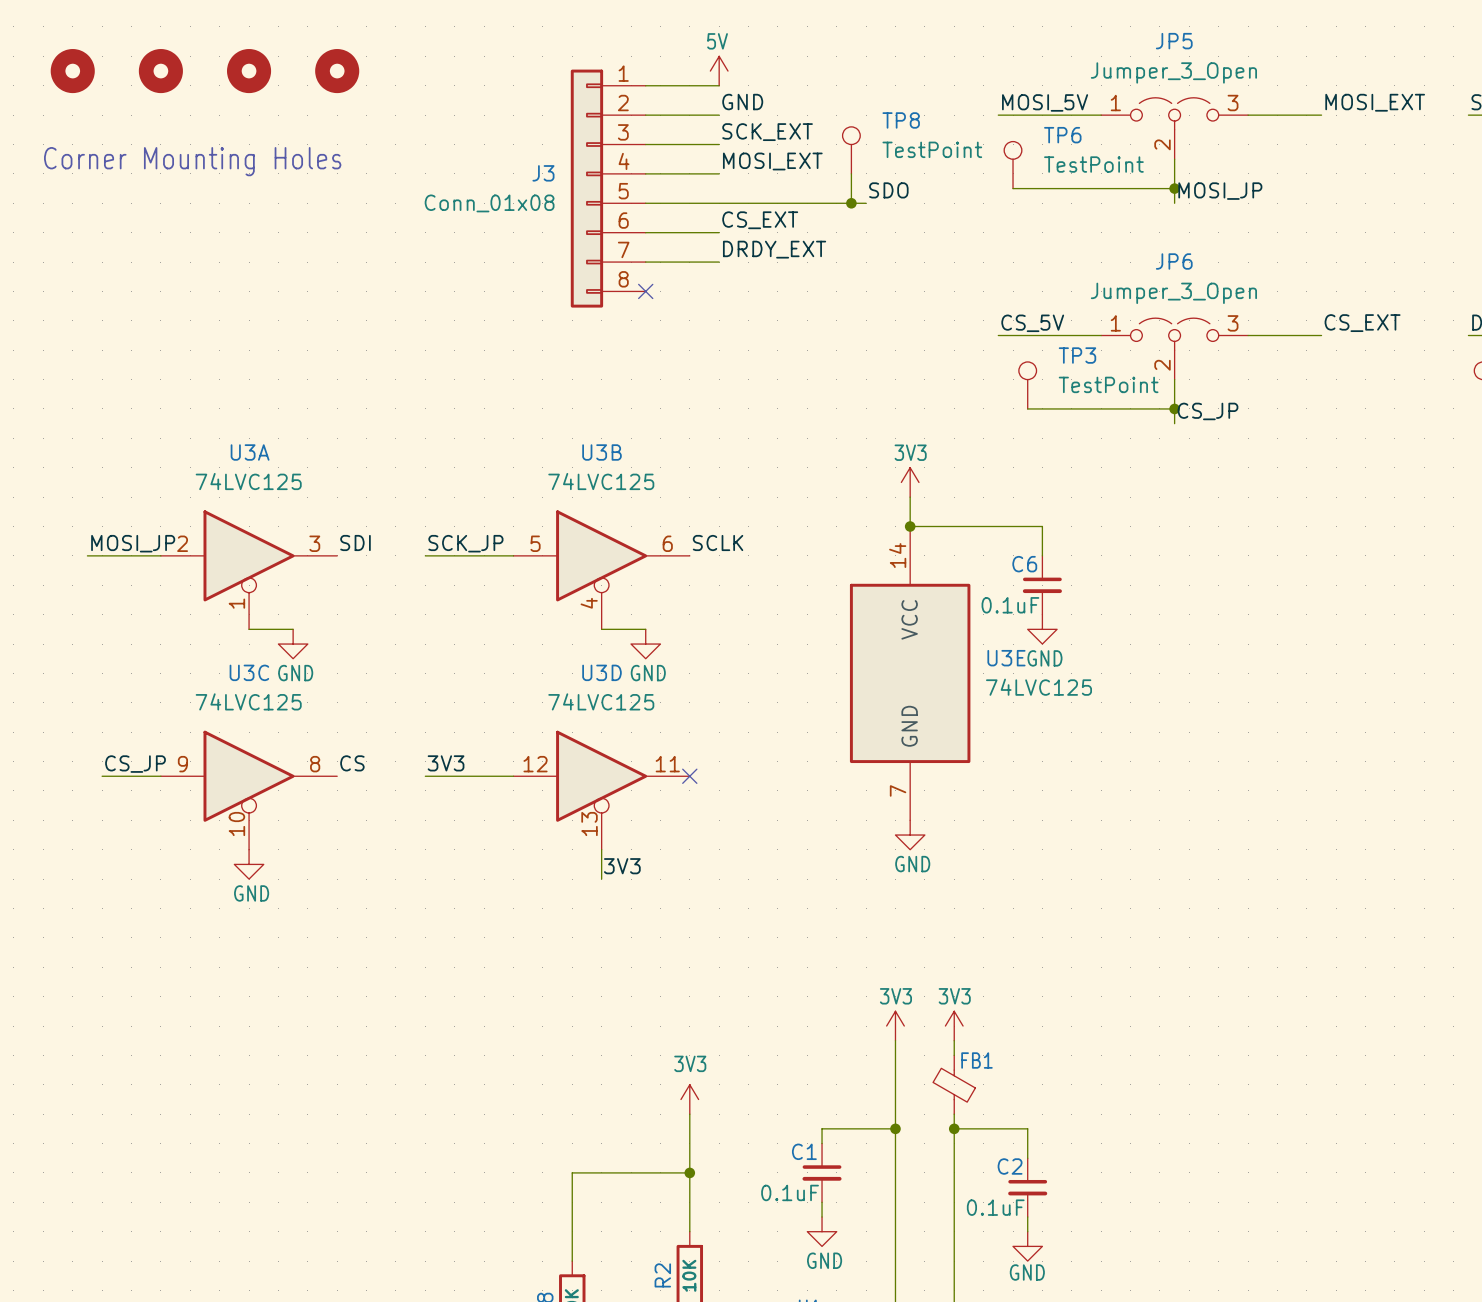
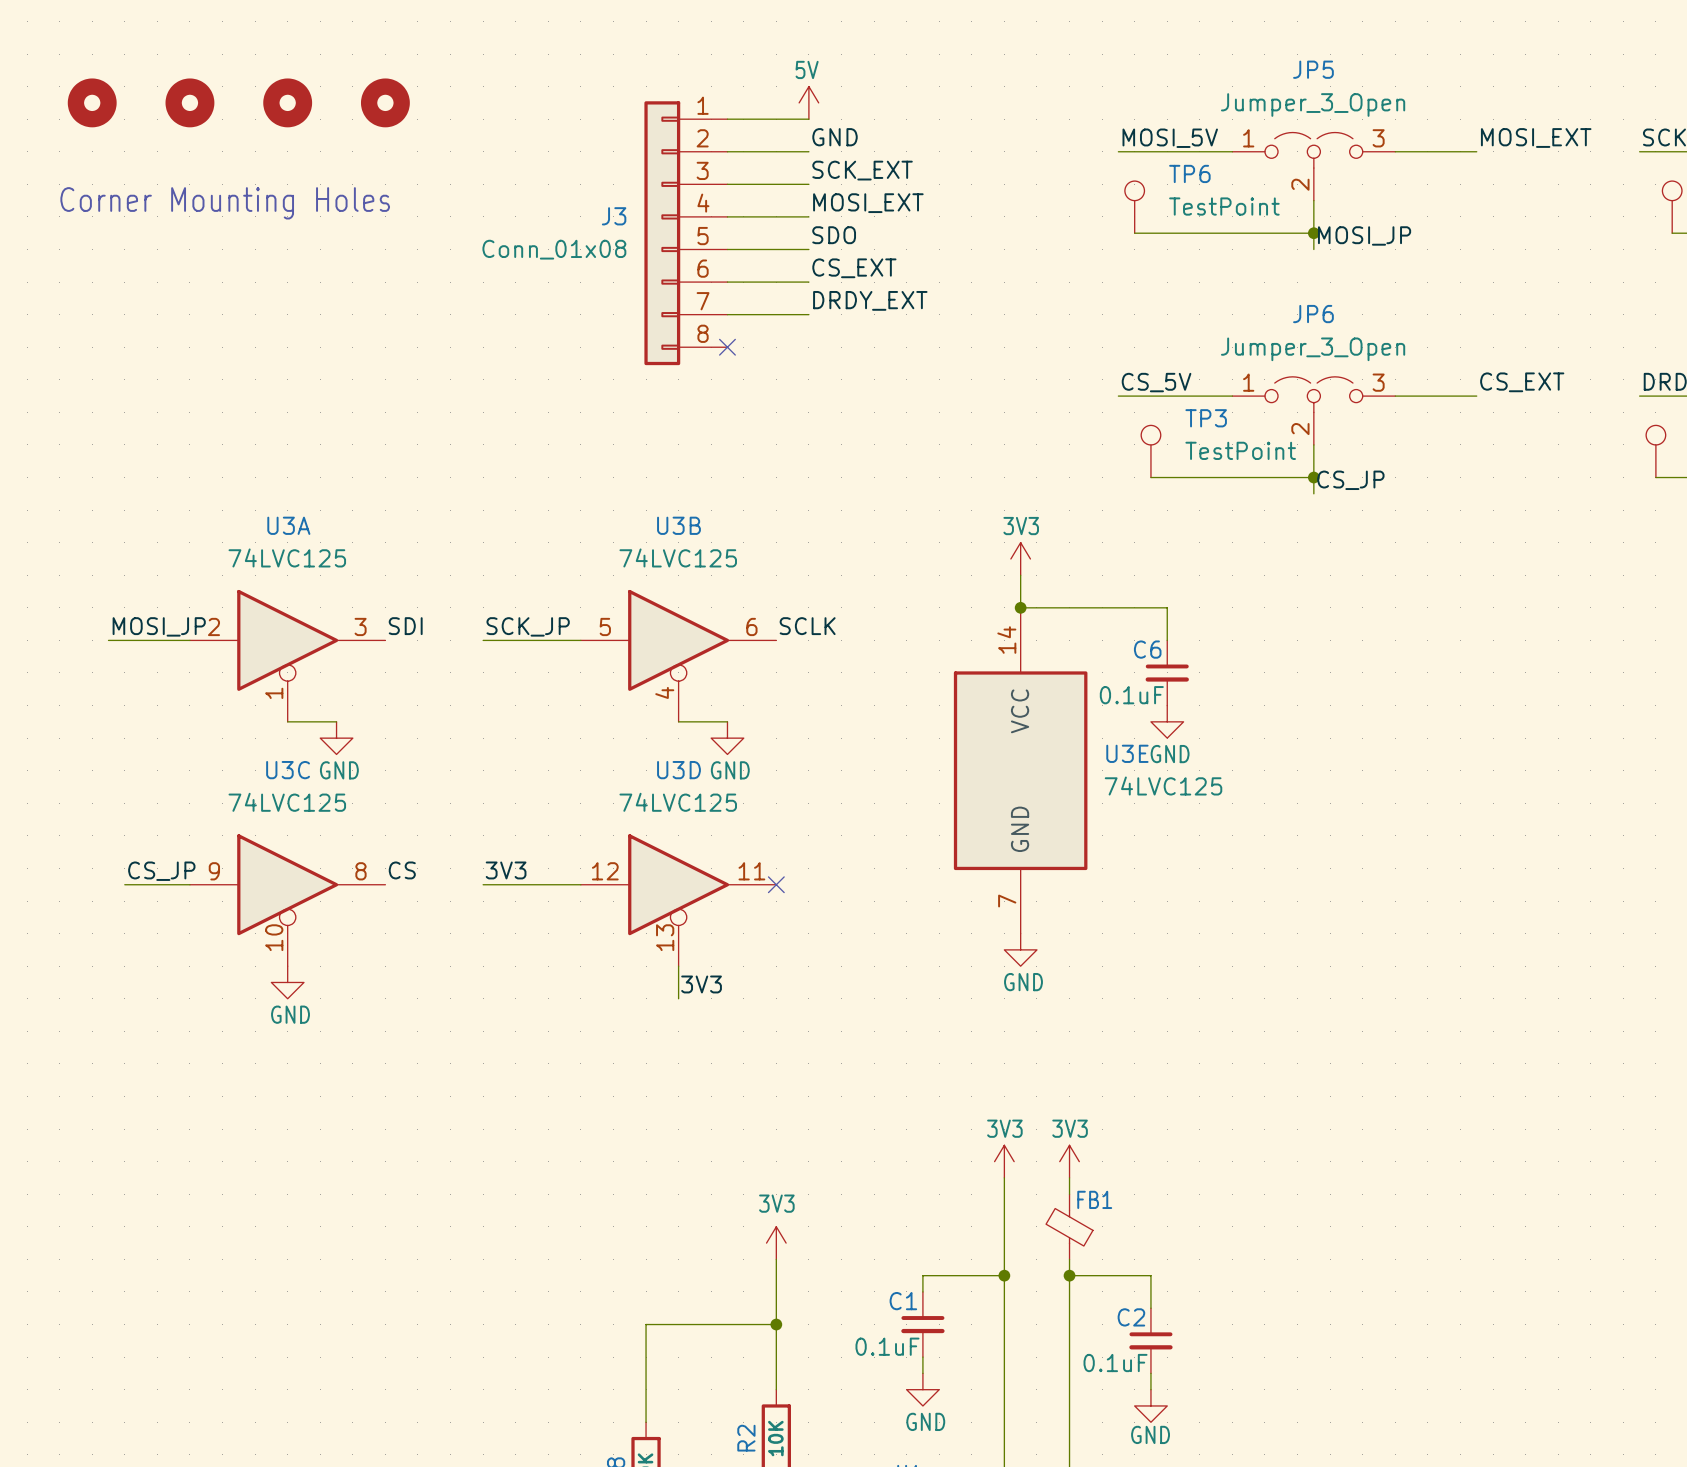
TP8: TestPoint (851, 150) -> none
wire: (851, 173) (851, 203) -> none
label position: SDO (888, 190) -> SDO (834, 235)
wire: (719, 203) (866, 203) -> none
junction: (851, 203) -> none

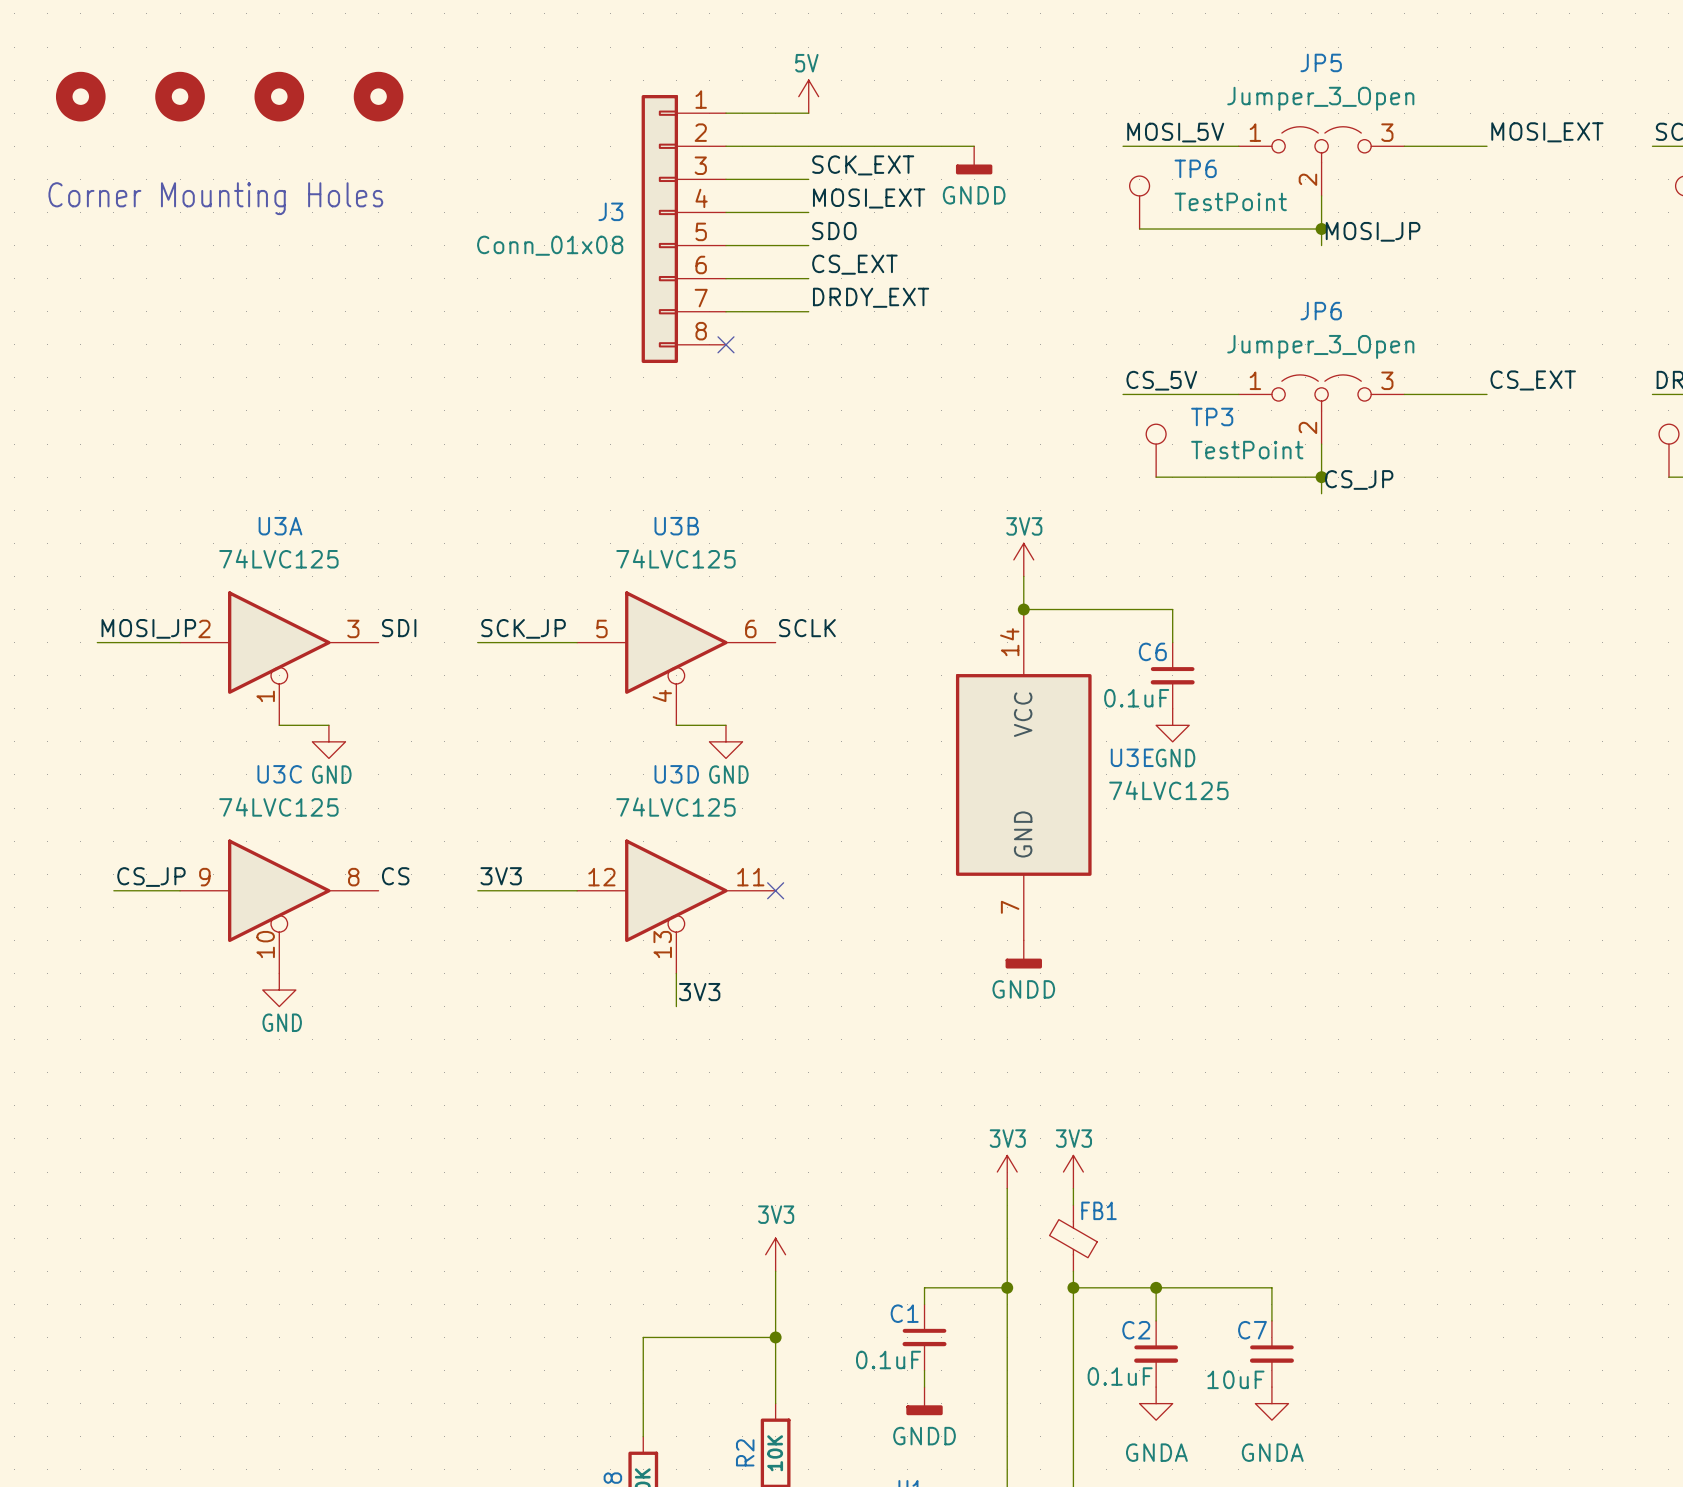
label: GND (835, 137) -> none
wire: none -> (808, 146) (974, 146)
power symbol: none -> GNDD (974, 160)
power symbol: GND (1020, 949) -> GNDD (1023, 954)
wire: none -> (1156, 1287) (1271, 1287) (1271, 1320)
junction: none -> (1156, 1287)
C7: none -> 10uF (1271, 1353)
power symbol: GND (922, 1389) -> GNDD (924, 1401)
power symbol: none -> GNDA (1156, 1403)
power symbol: none -> GNDA (1271, 1403)
power symbol: GND (1150, 1405) -> none

